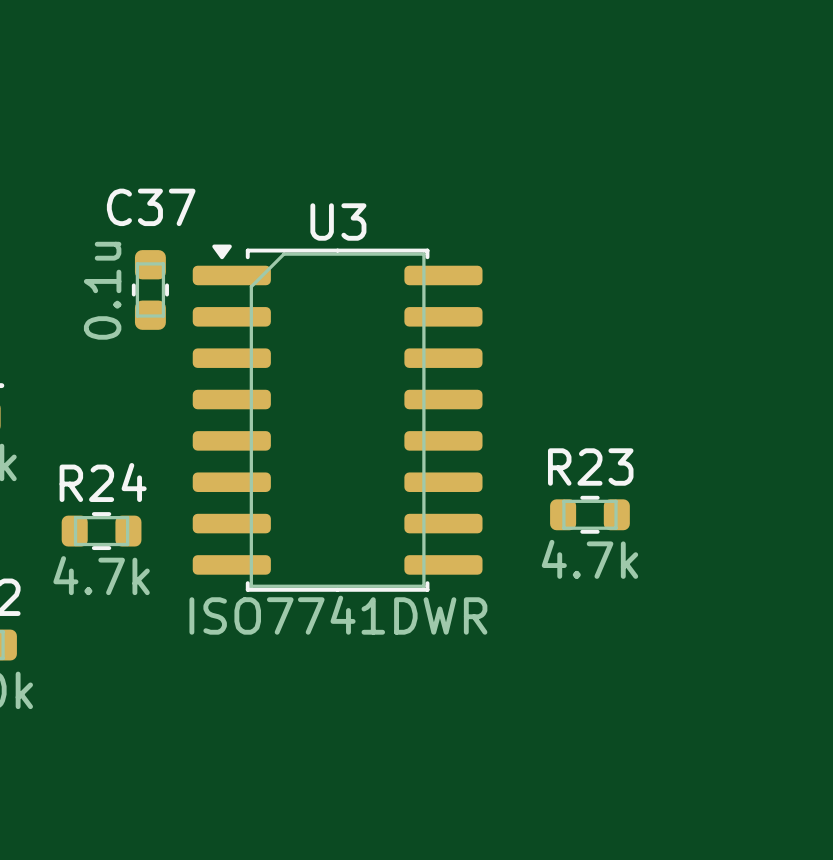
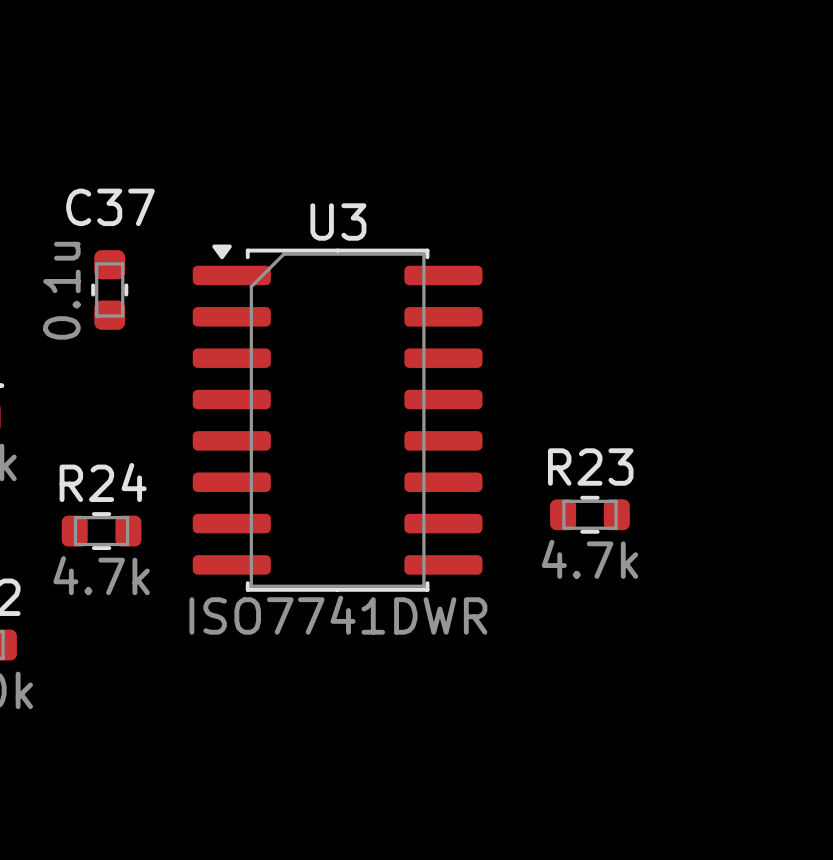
C37 position: (150, 289) -> (109, 289)

